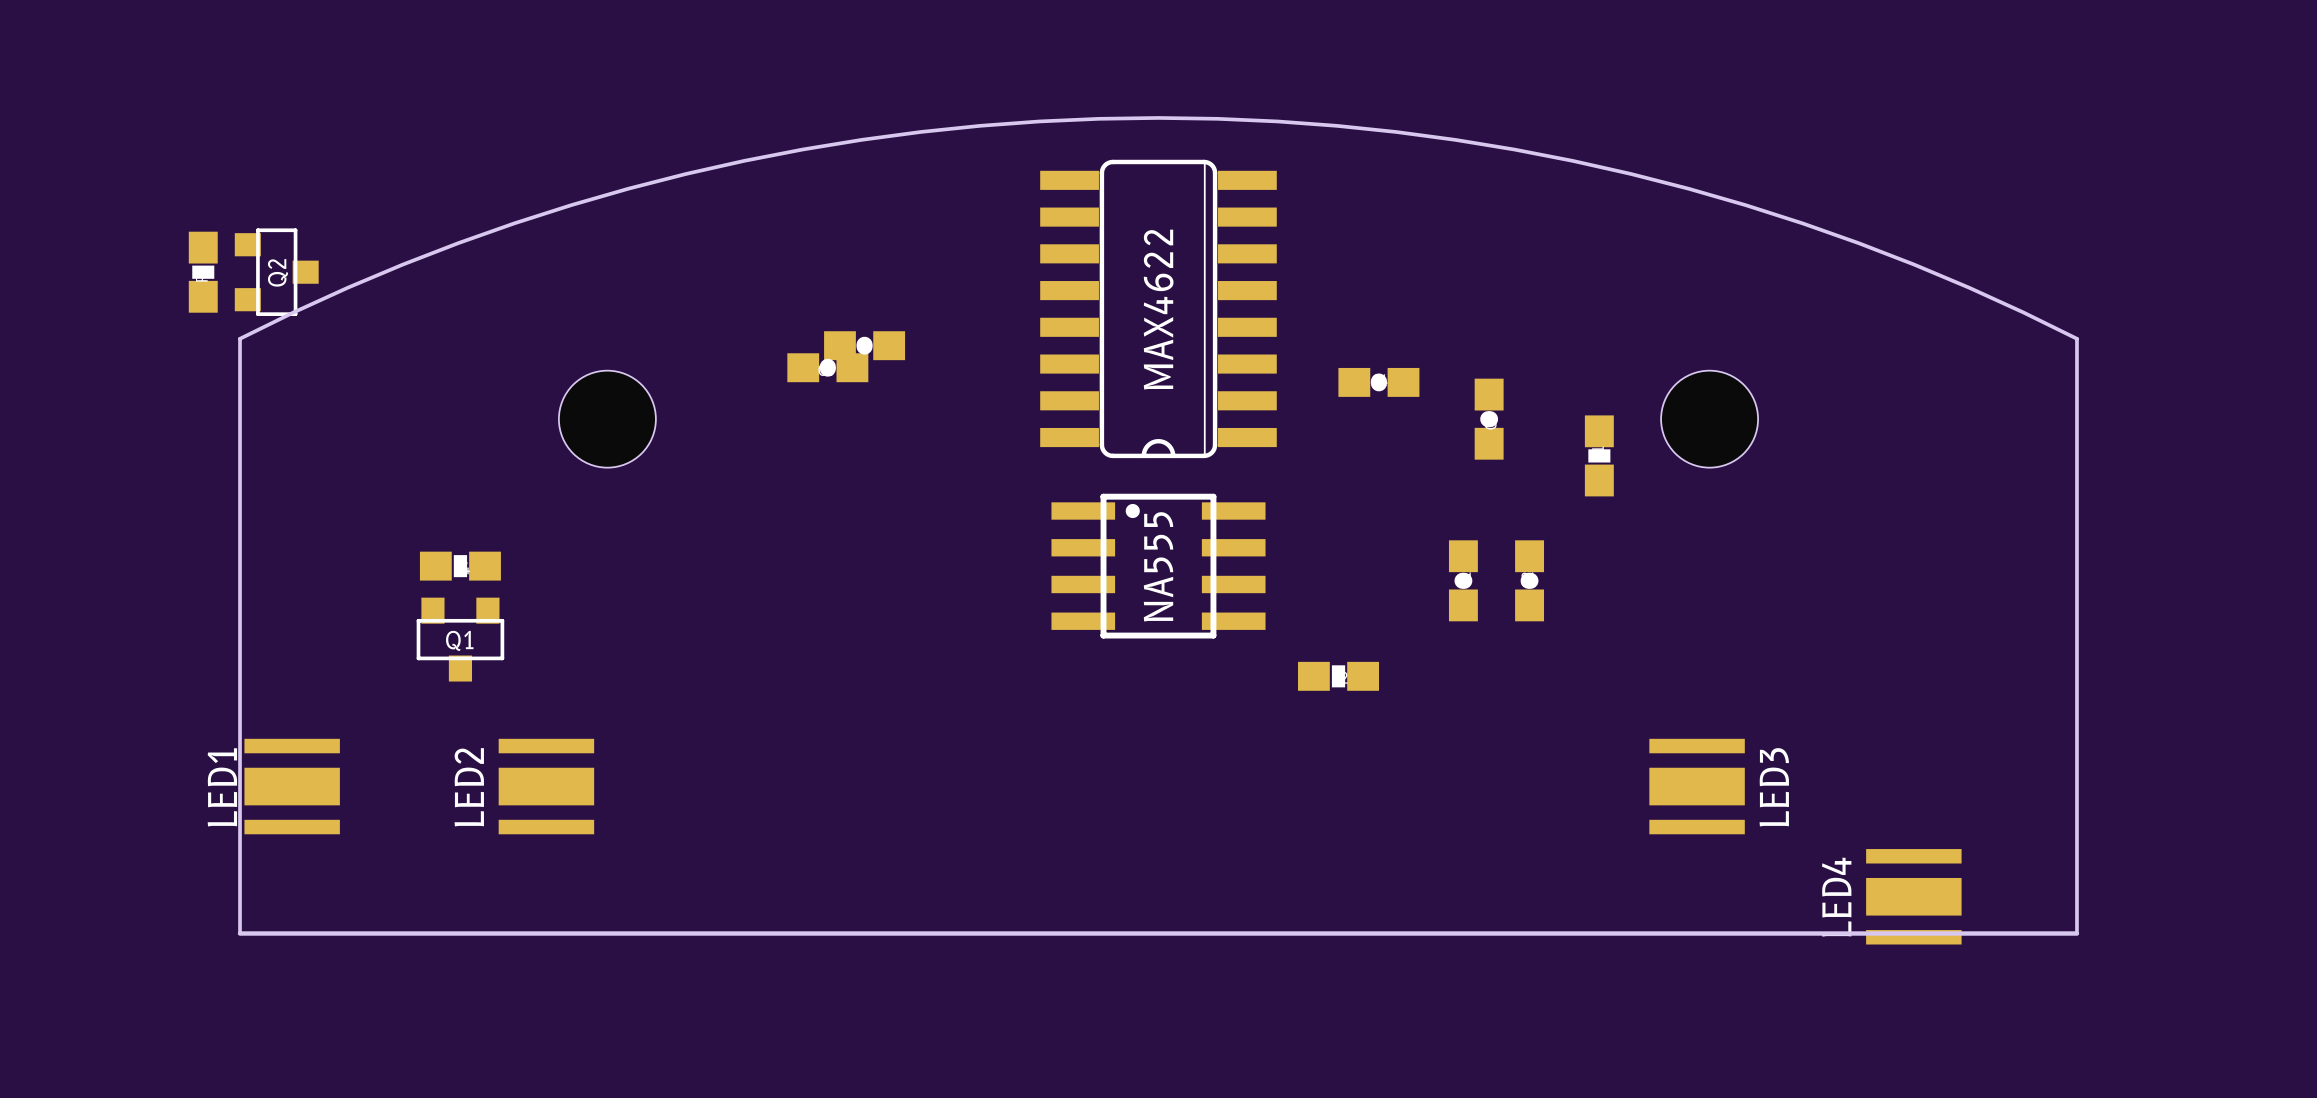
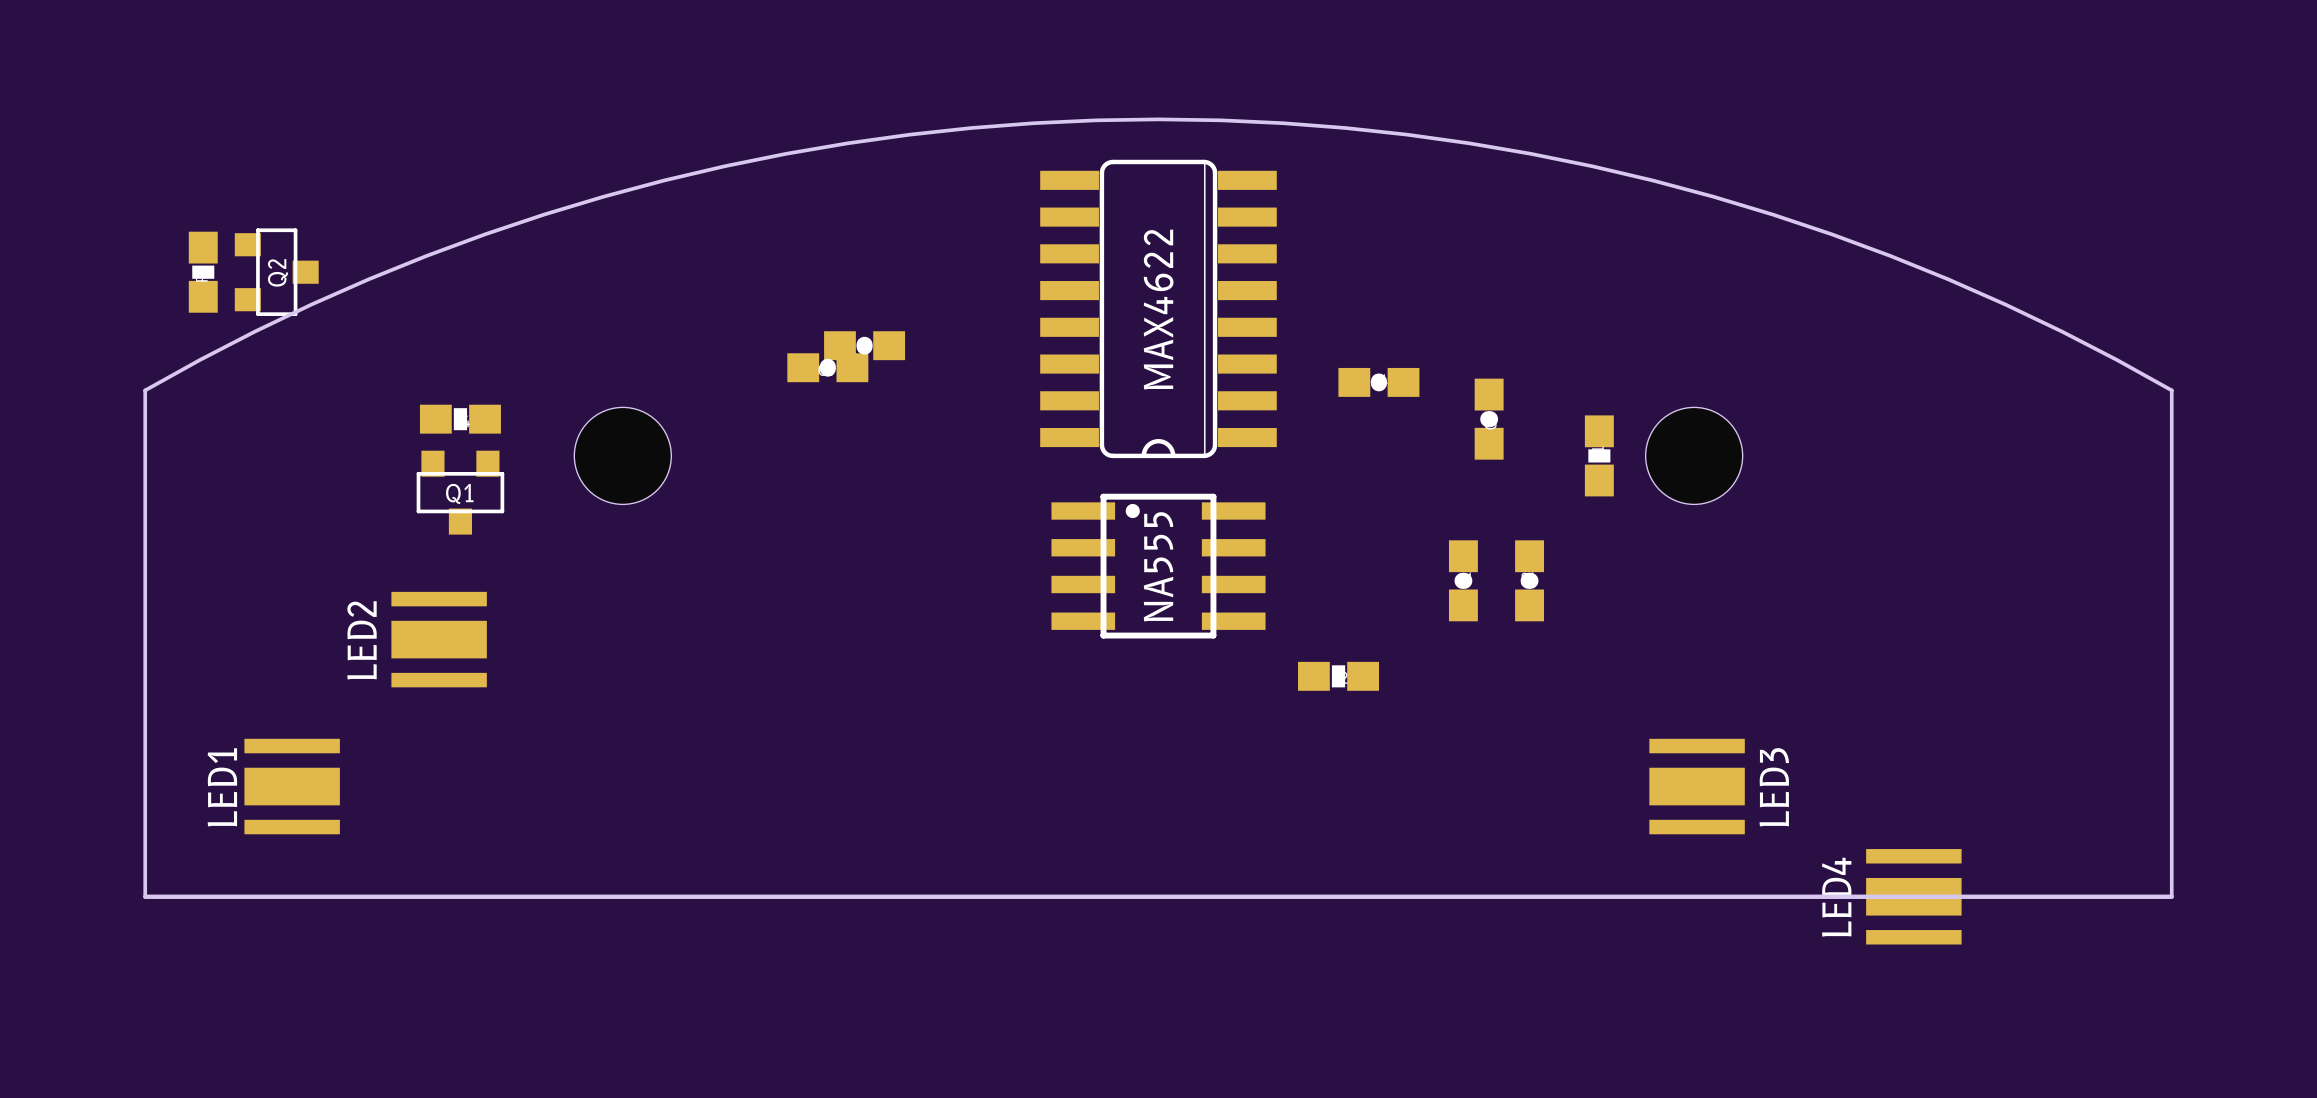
board edge: (240, 338) (240, 933) (2076, 933) (2076, 338) (1969, 287) (1914, 264) (1802, 223) (1745, 205) (1630, 173) (1514, 149) (1396, 131) (1277, 121) (1158, 117) (1098, 118) (979, 125) (861, 139) (802, 149) (686, 173) (628, 188) (514, 223) (402, 264) (347, 287) (240, 338) -> (145, 390) (145, 896) (2171, 896) (2171, 390) (2061, 331) (1948, 279) (1831, 234) (1772, 214) (1652, 180) (1591, 166) (1469, 143) (1345, 127) (1220, 120) (1096, 120) (1033, 123) (909, 134) (847, 143) (725, 166) (664, 180) (544, 214) (485, 234) (368, 279) (311, 304) (199, 360) (145, 390)
hole position: (607, 419) -> (622, 455)
hole position: (1709, 419) -> (1694, 455)
part position: (460, 566) -> (460, 419)
Q1 position: (460, 639) -> (460, 492)
LED2 position: (546, 786) -> (439, 639)

